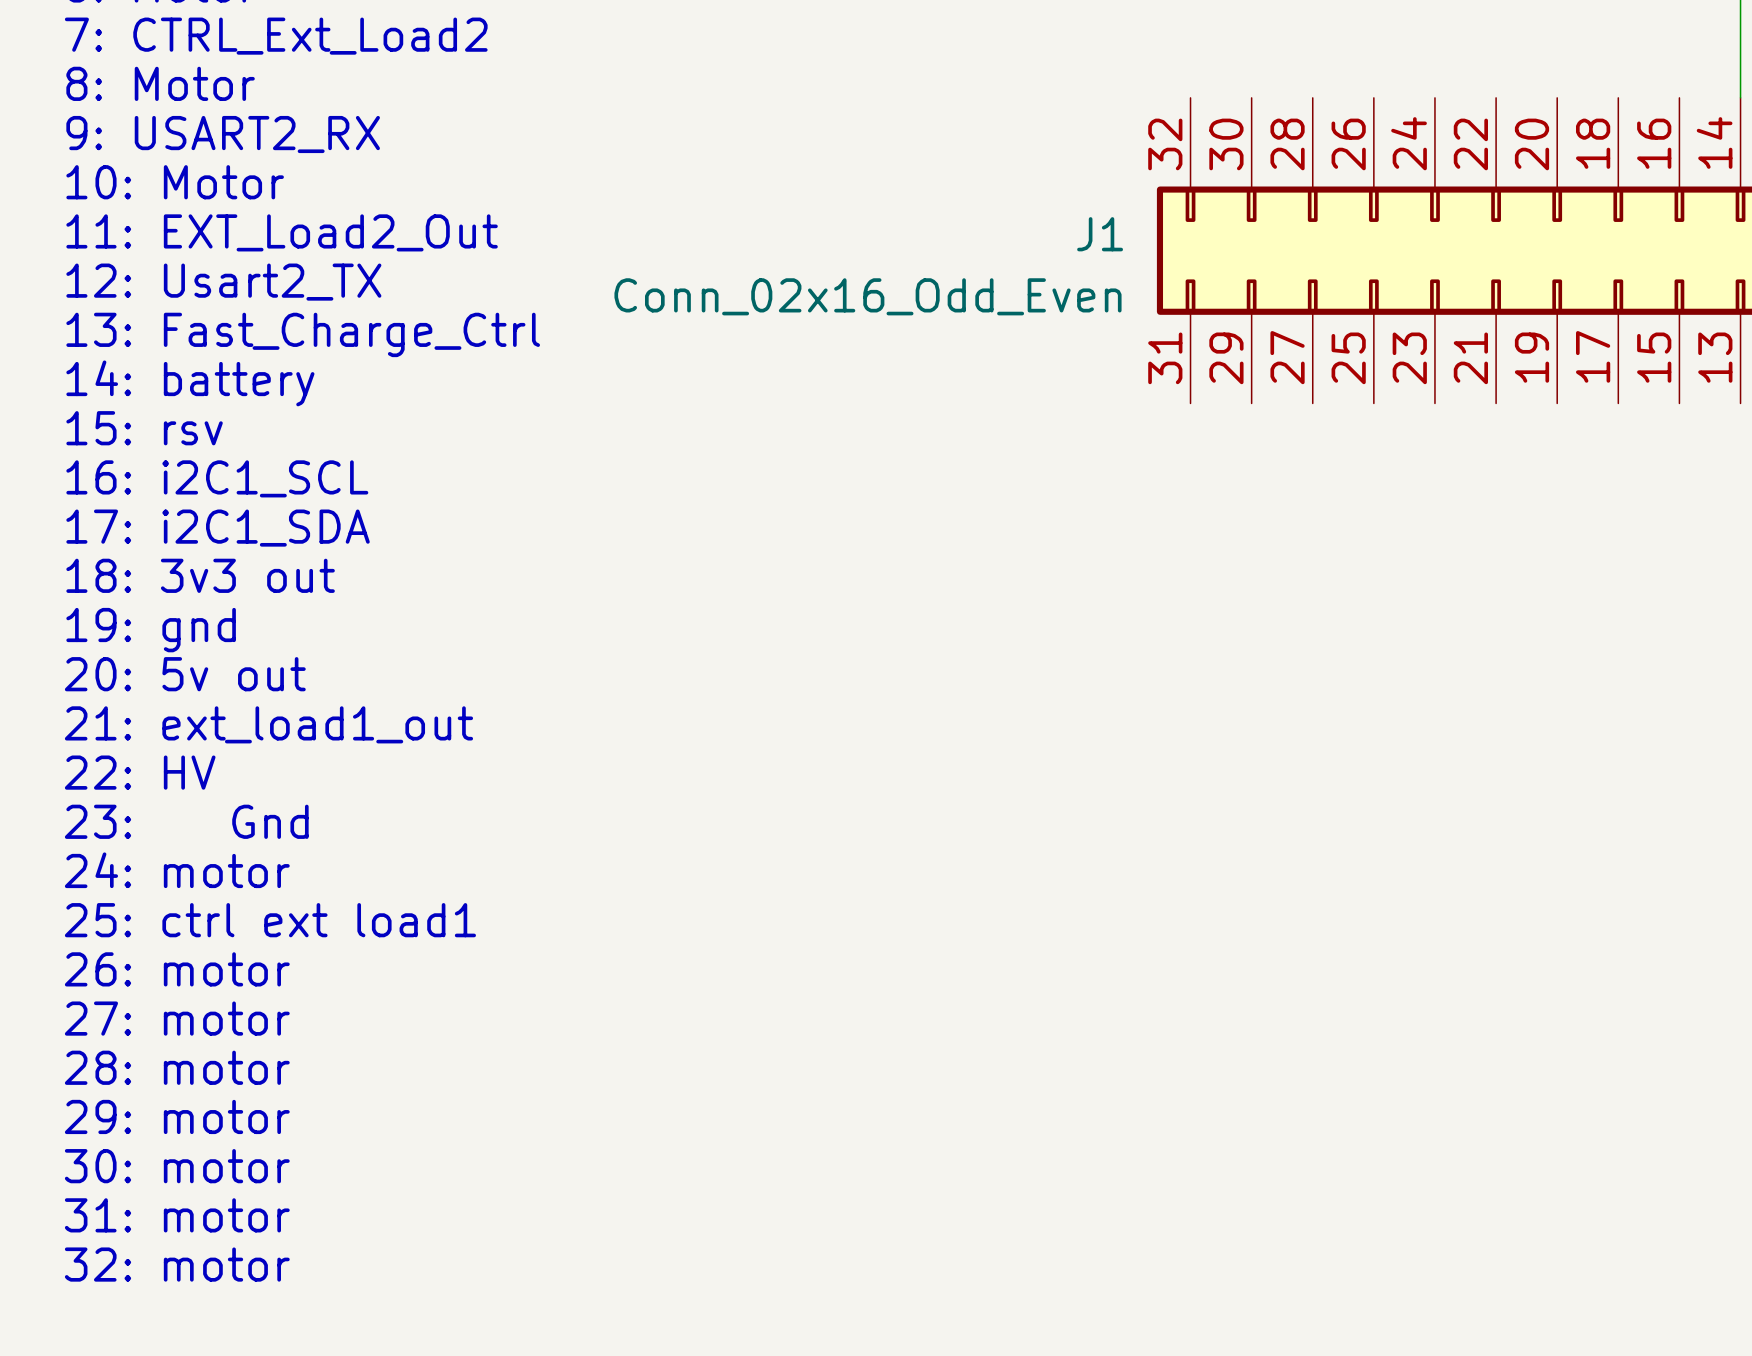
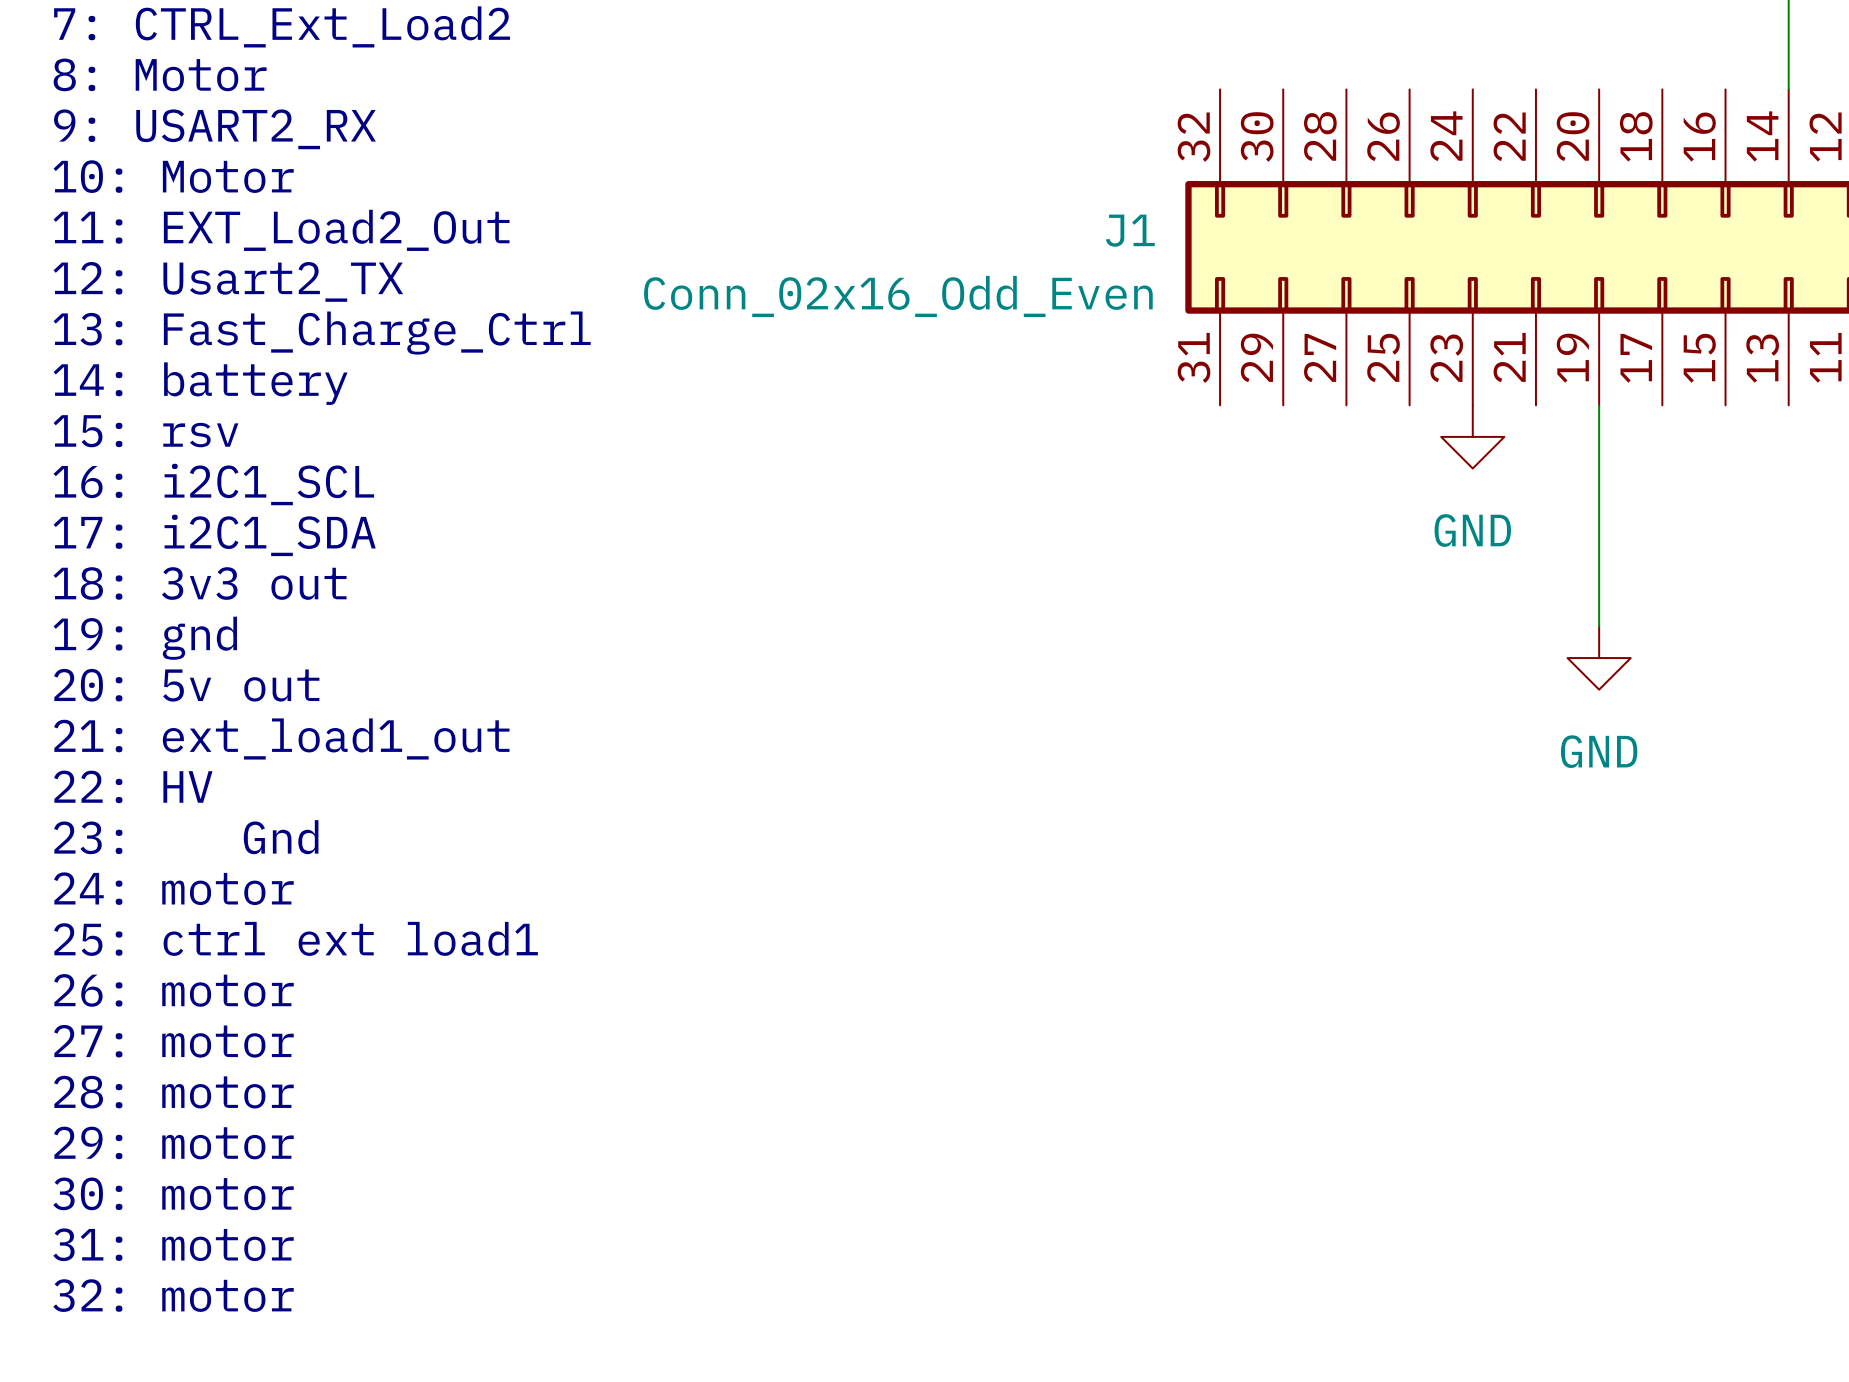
wire: none -> (1599, 405) (1599, 626)
power symbol: none -> GND (1472, 436)
power symbol: none -> GND (1599, 658)

